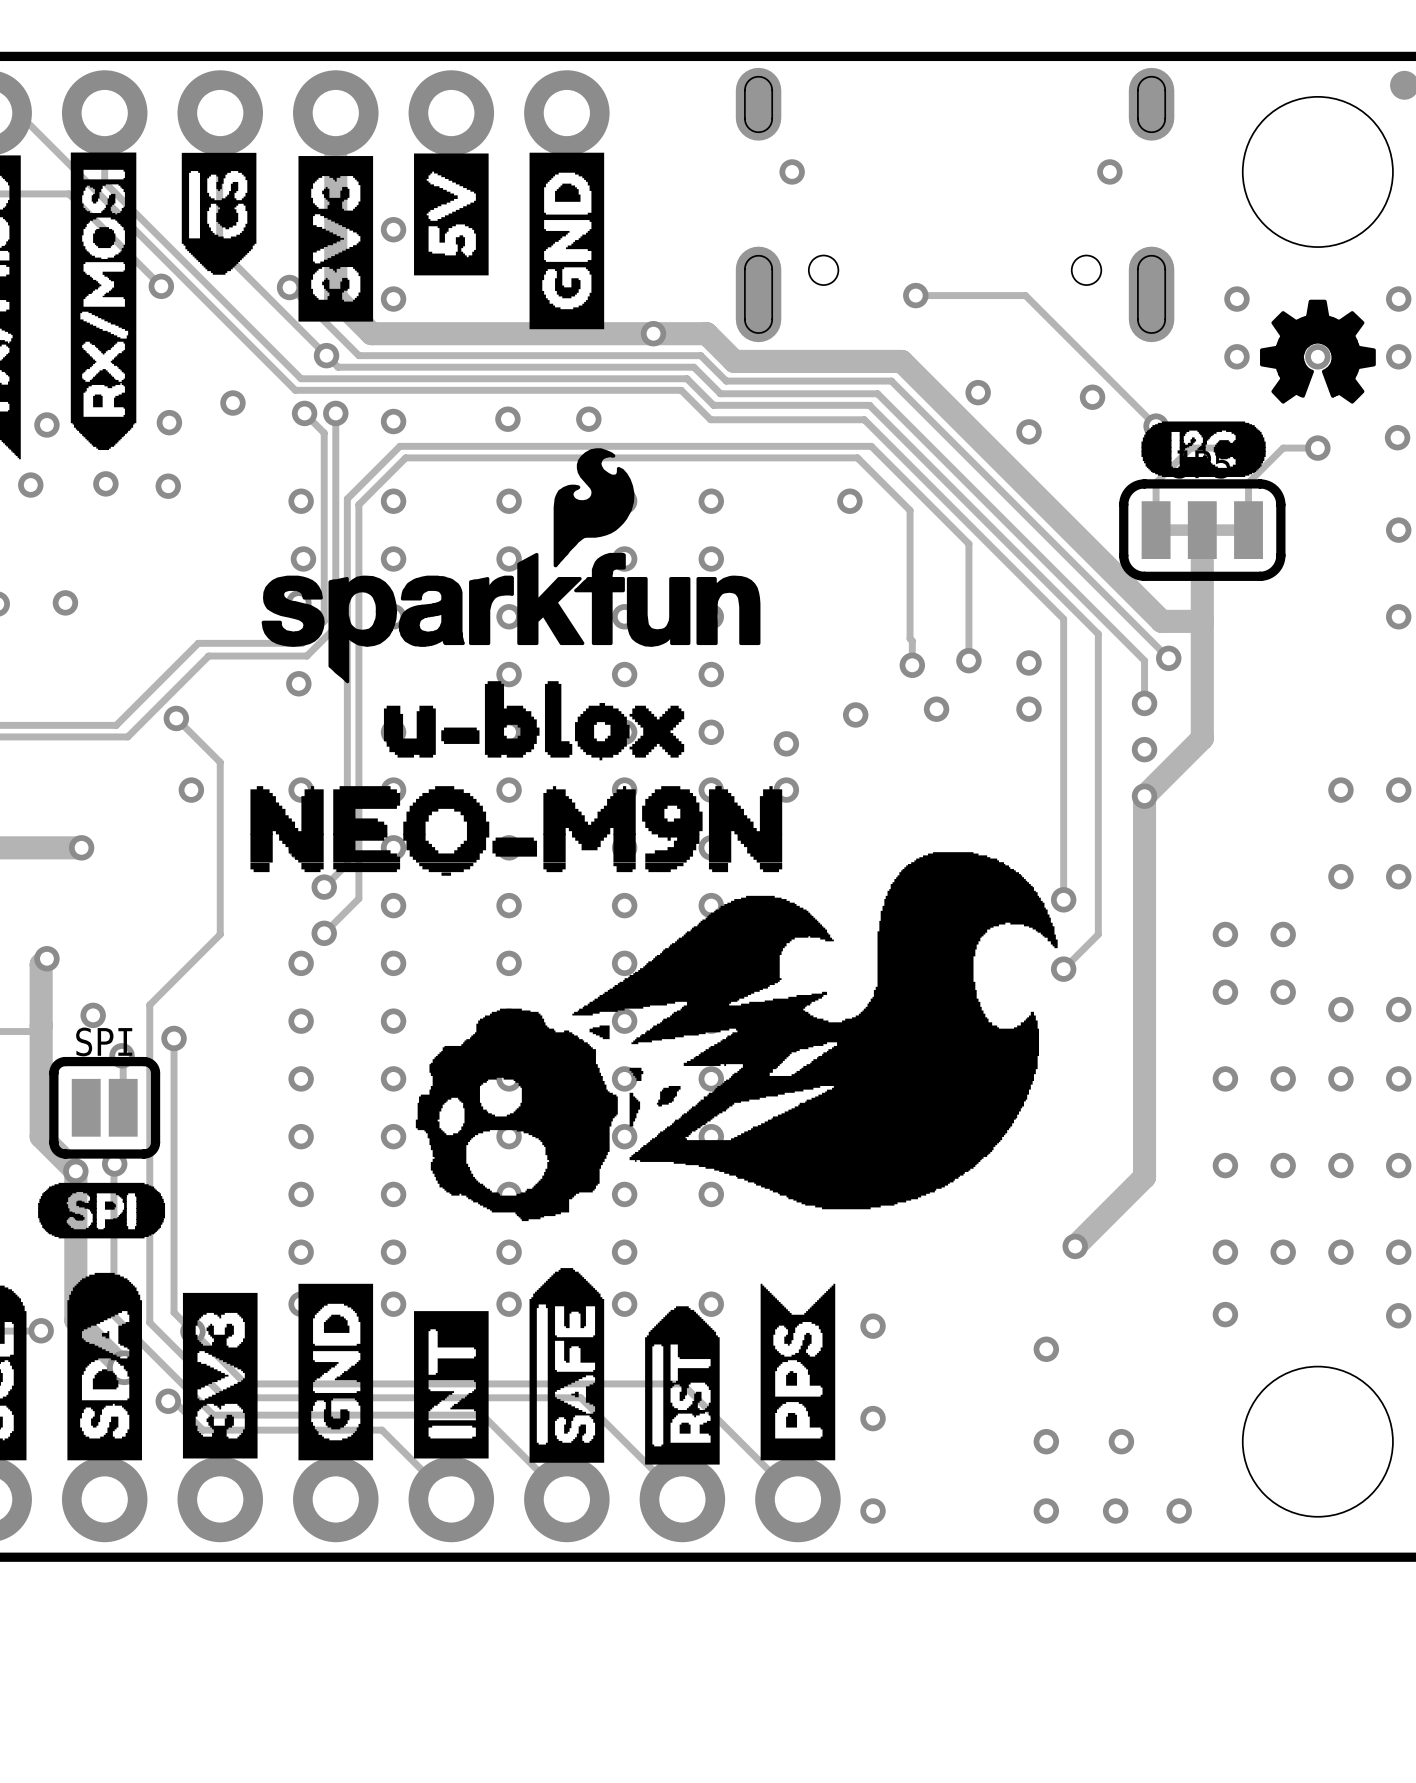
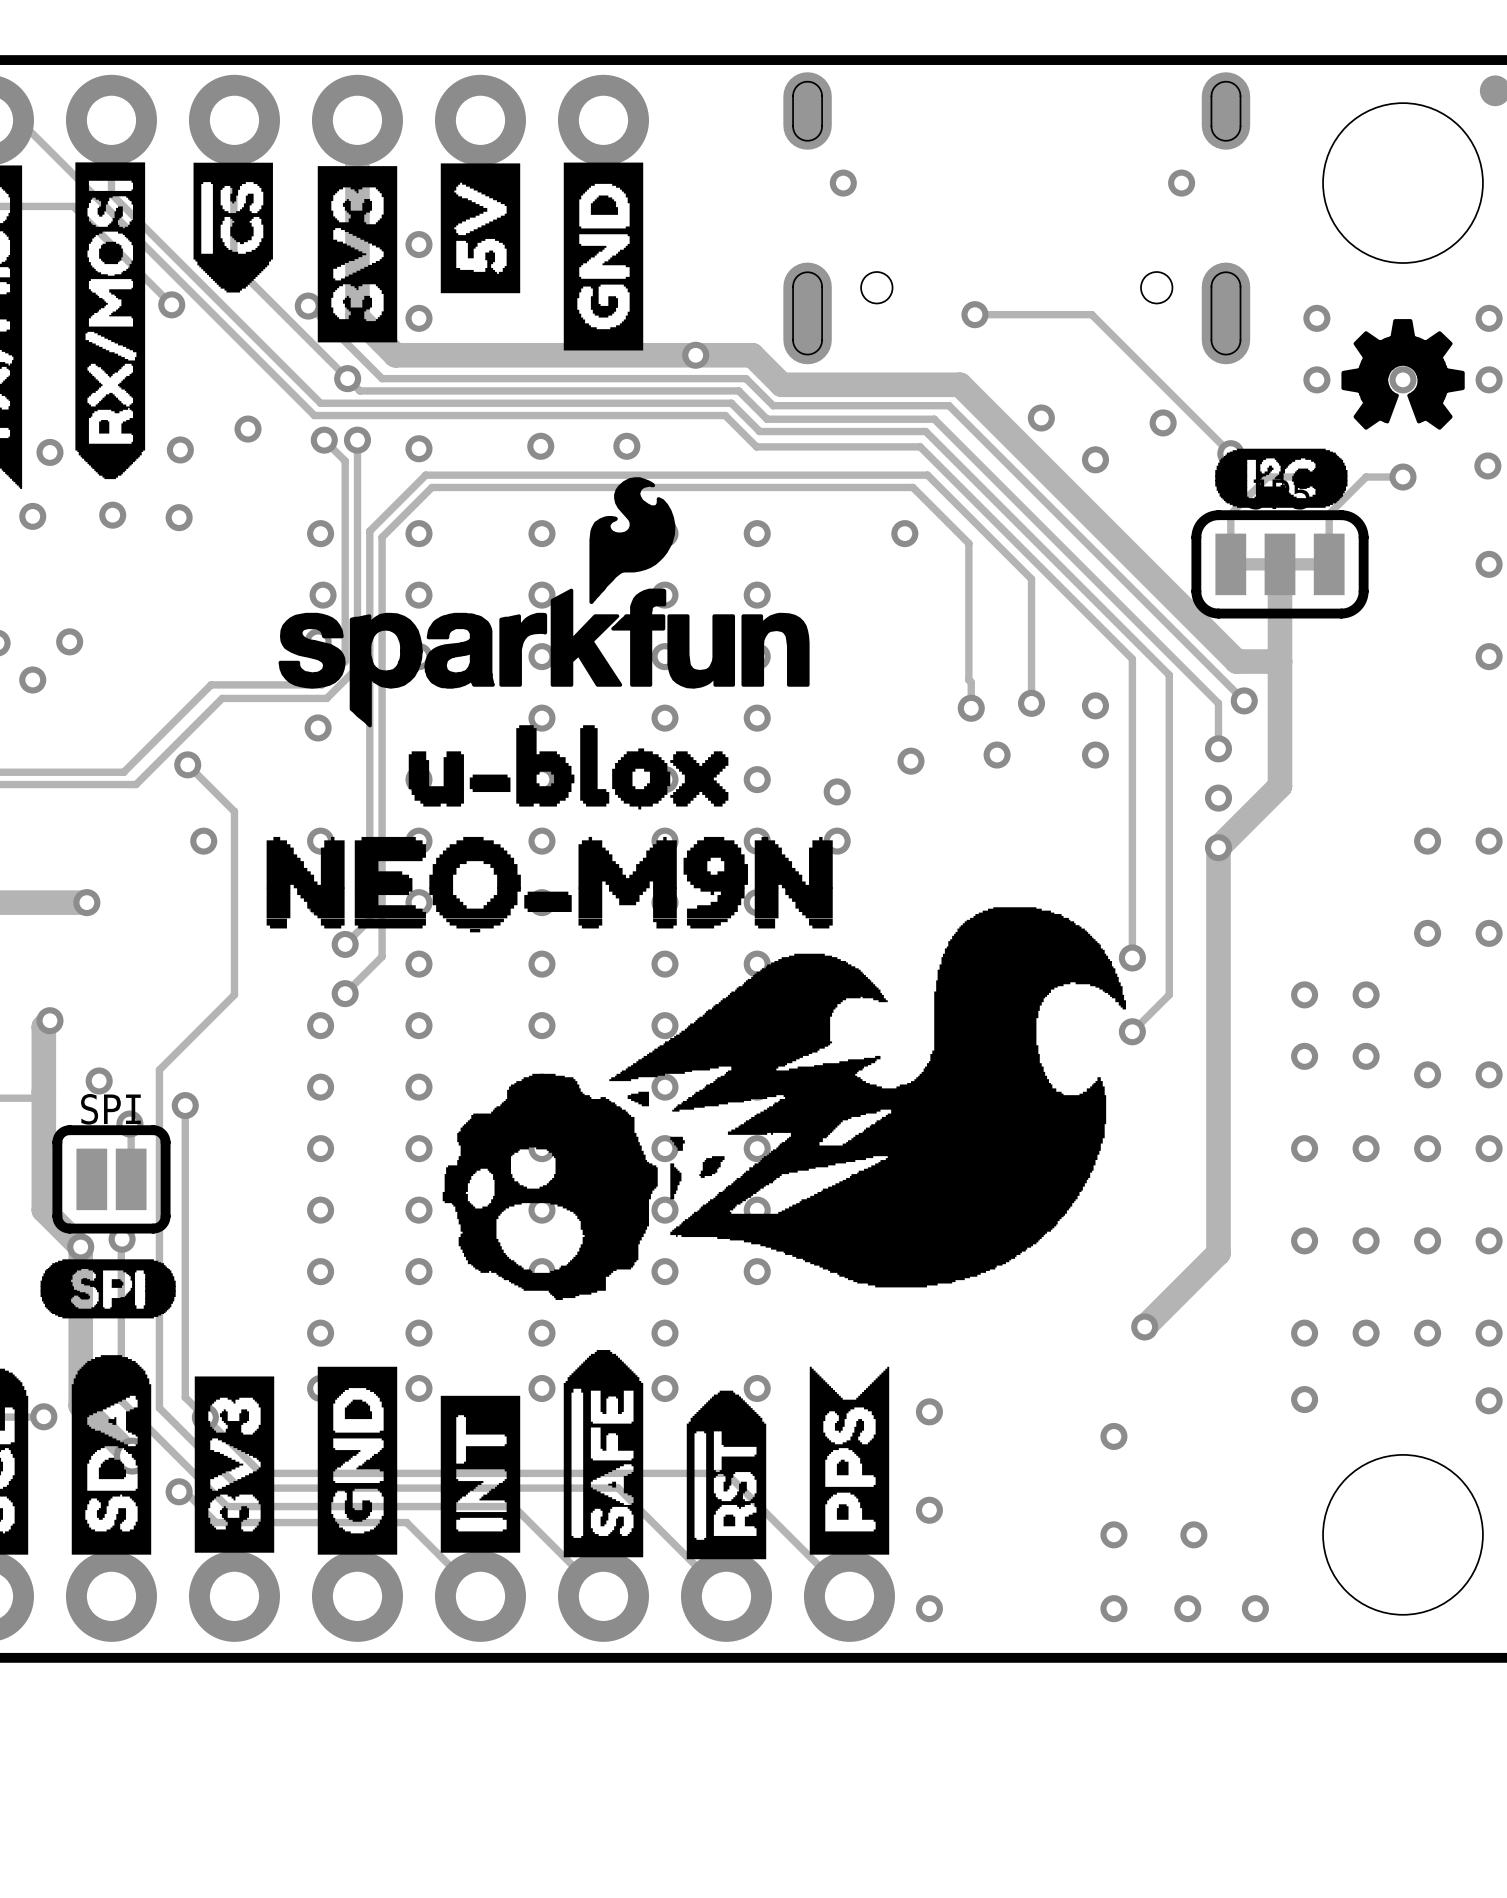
via: none -> (32, 679)

